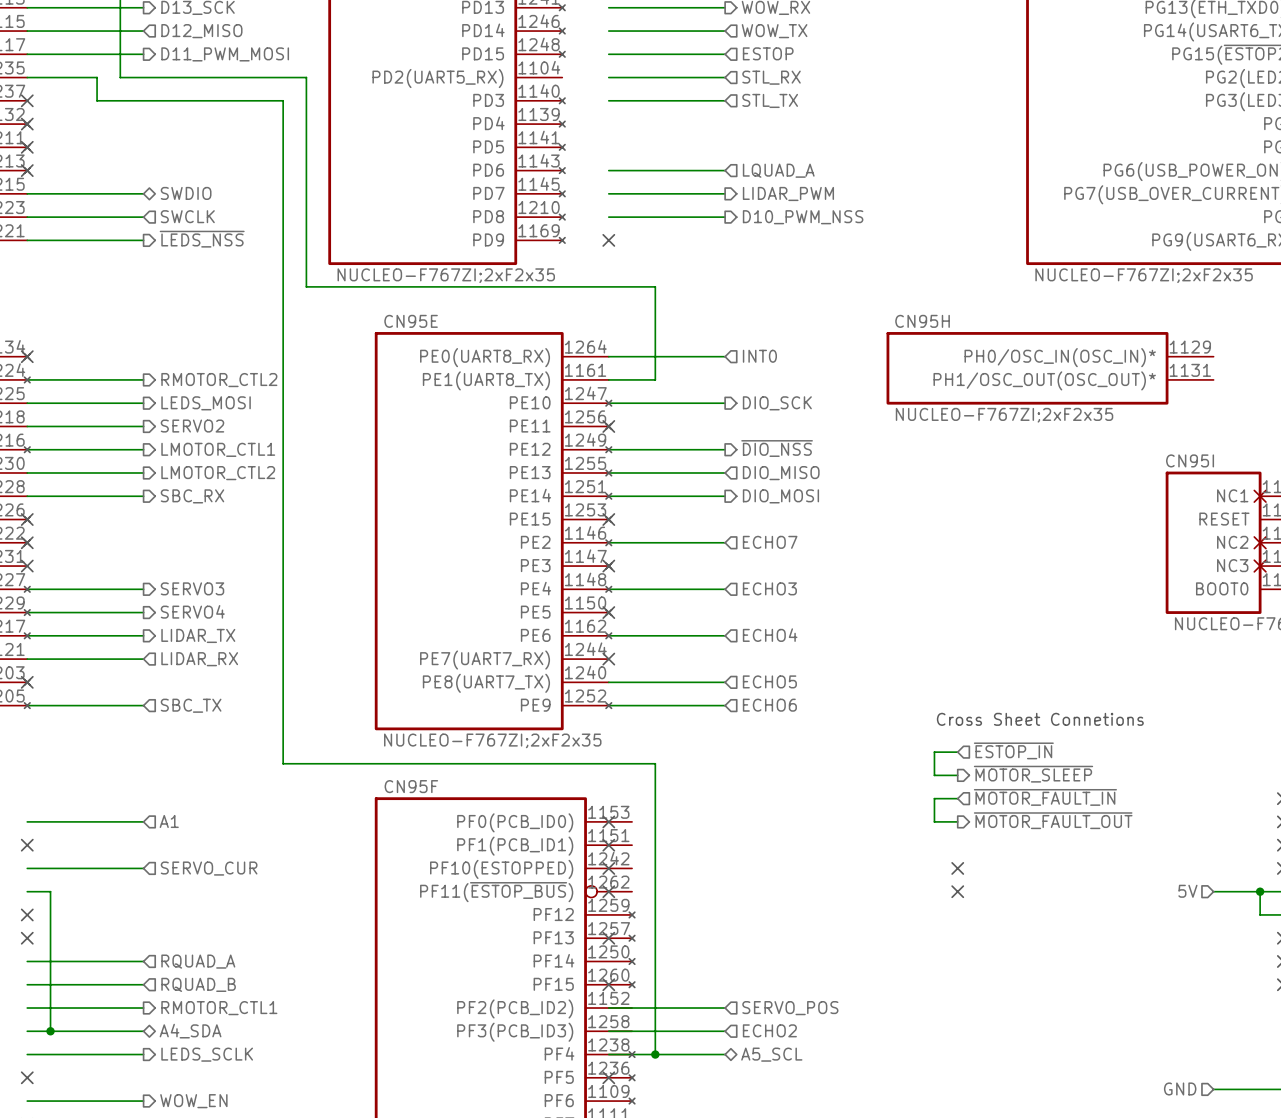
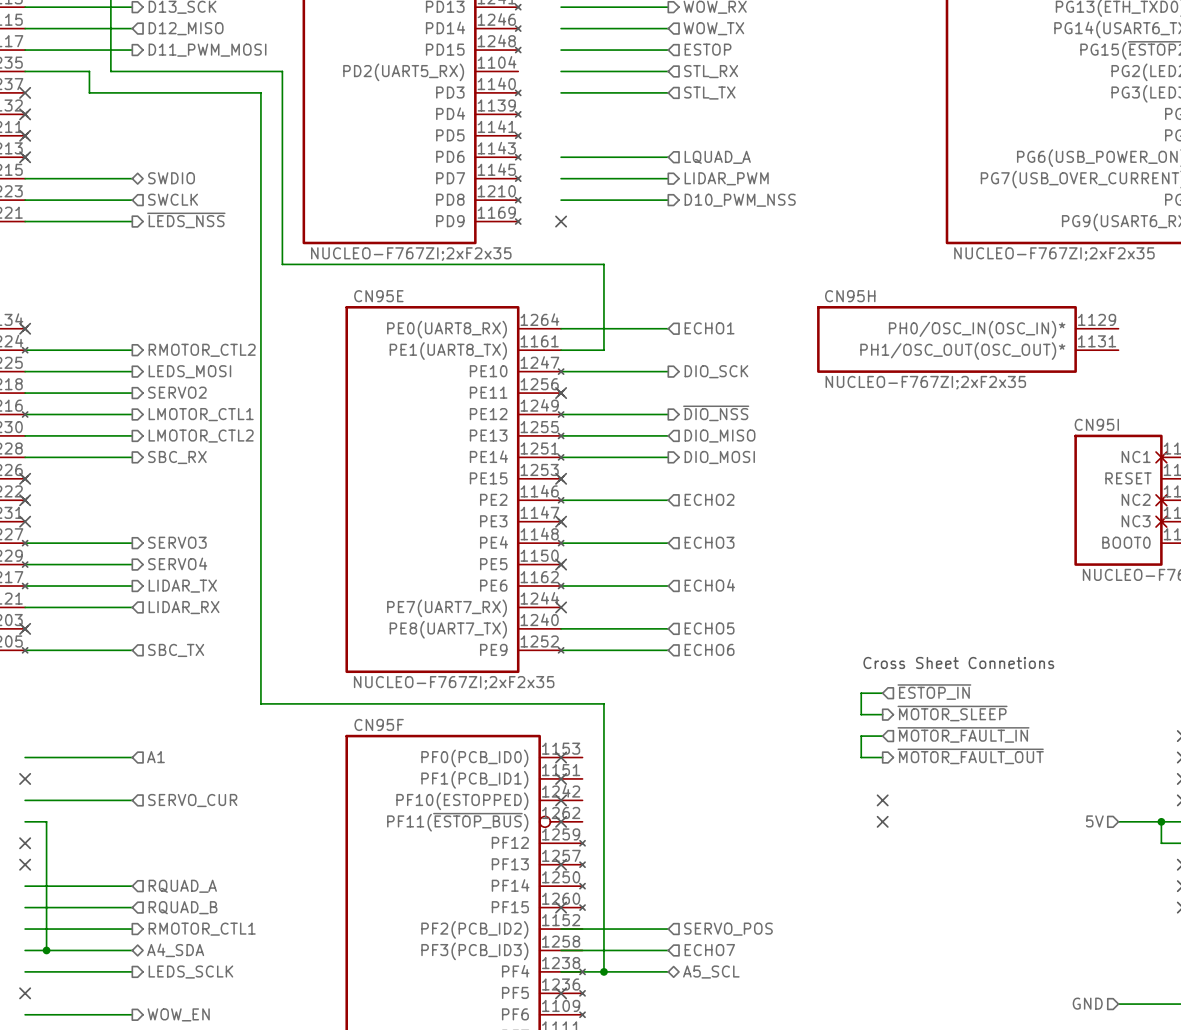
hierarchical label: INT0 (759, 356) -> ECHO1 (709, 328)
hierarchical label: ECHO7 (770, 542) -> ECHO2 (709, 499)
hierarchical label: ECHO2 (769, 1030) -> ECHO7 (709, 950)

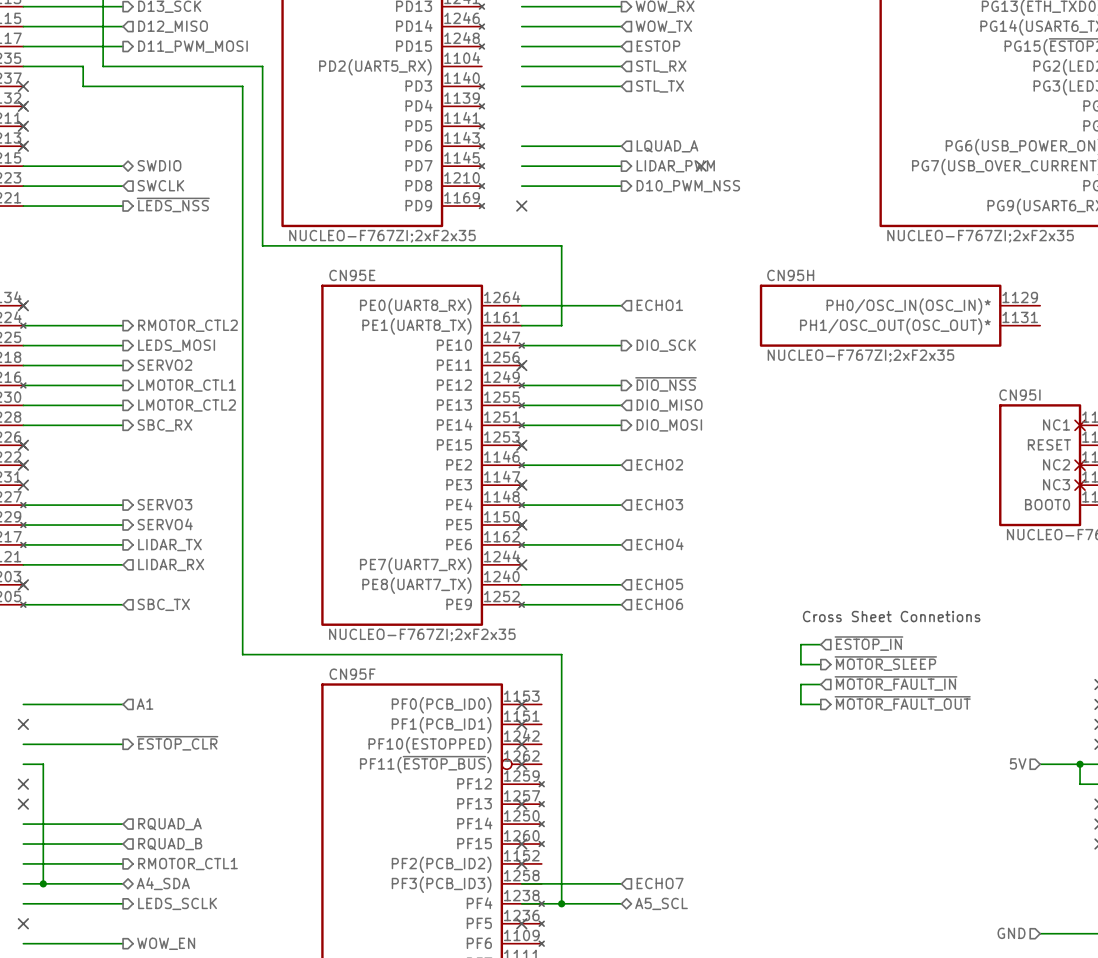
no-connect mark: none -> (701, 166)
hierarchical label shape: input (192, 800) -> output (177, 743)
hierarchical label: SERVO_CUR (192, 800) -> ~{ESTOP_CLR} (177, 743)
no-connect mark: (882, 800) -> none
no-connect mark: (882, 821) -> none
wire: (561, 929) (668, 929) -> none
no-connect mark: none -> (521, 863)
hierarchical label: SERVO_POS (728, 929) -> none

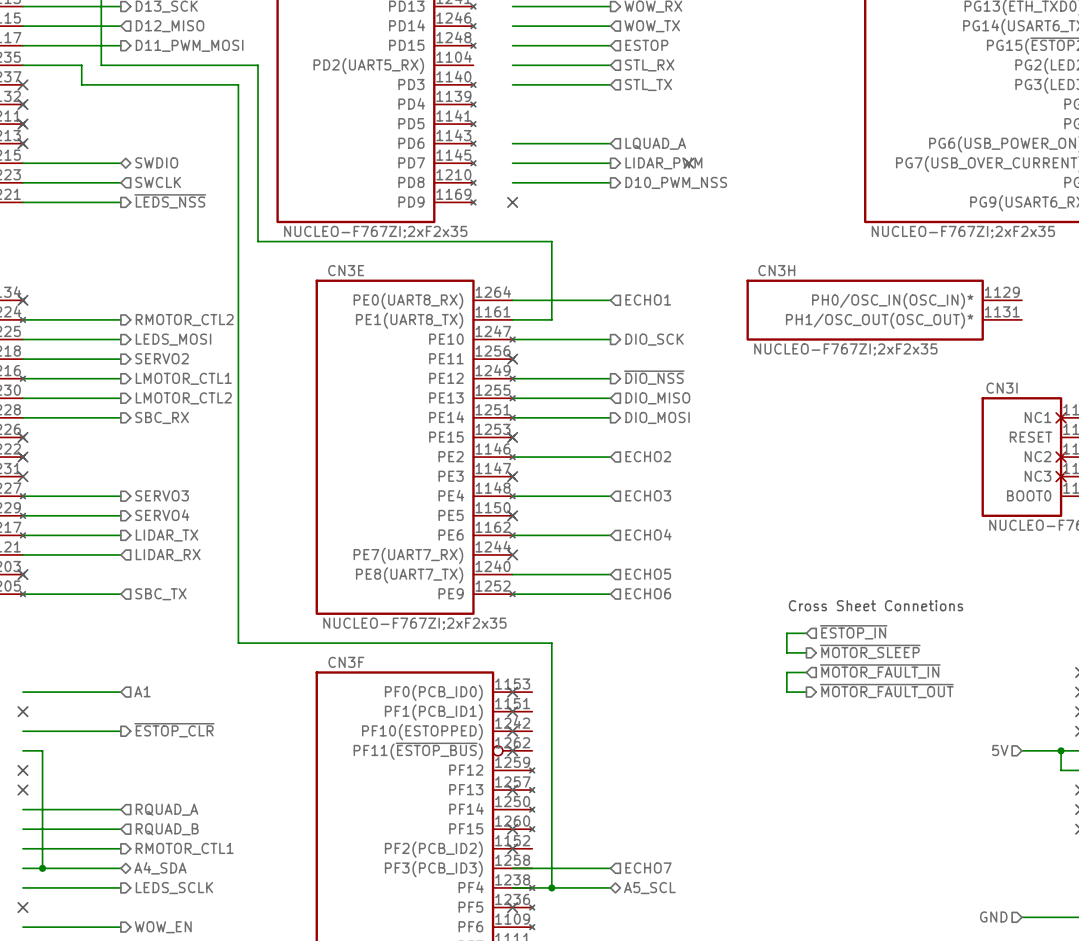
CN95E name: CN95E (352, 275) -> CN3E (346, 270)
CN95H name: CN95H (790, 275) -> CN3H (776, 270)
CN95I name: CN95I (1019, 395) -> CN3I (1002, 388)
CN95F name: CN95F (352, 674) -> CN3F (346, 662)

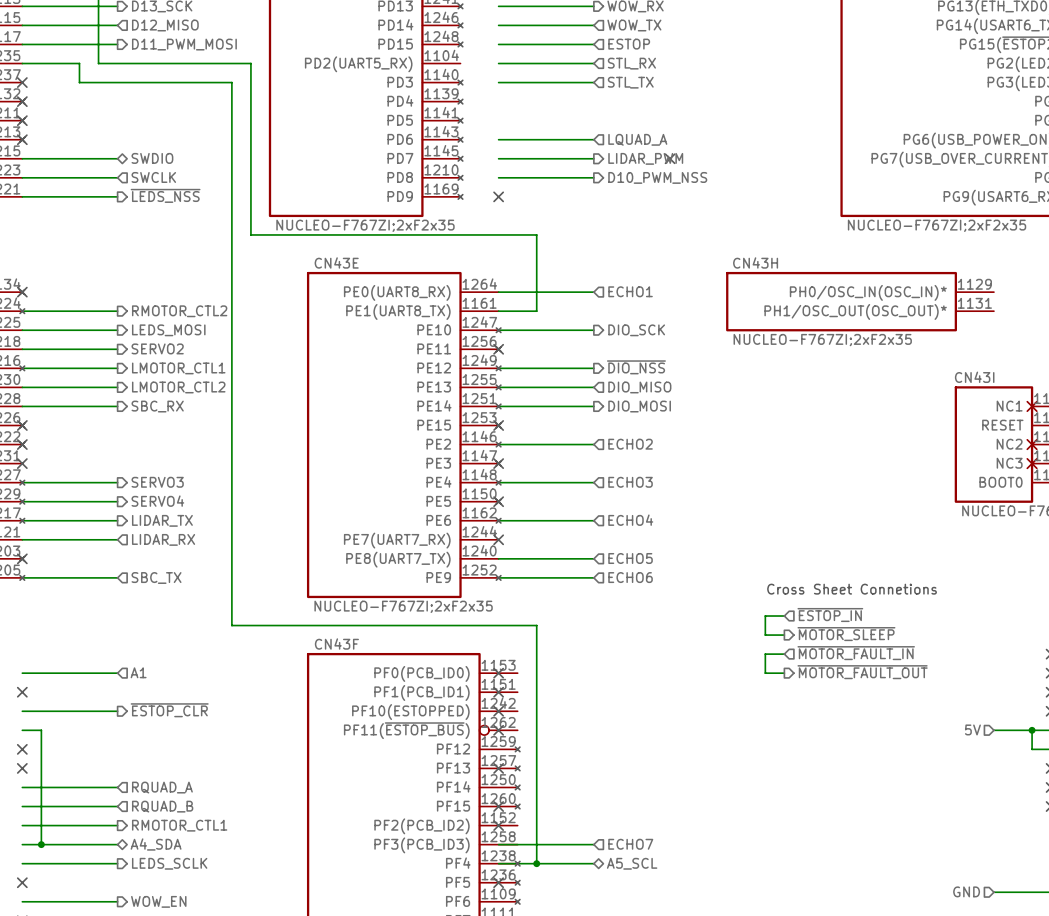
CN3E name: CN3E (346, 270) -> CN43E (336, 262)
CN3H name: CN3H (776, 270) -> CN43H (755, 262)
CN3I name: CN3I (1002, 388) -> CN43I (974, 377)
CN3F name: CN3F (346, 662) -> CN43F (336, 644)

